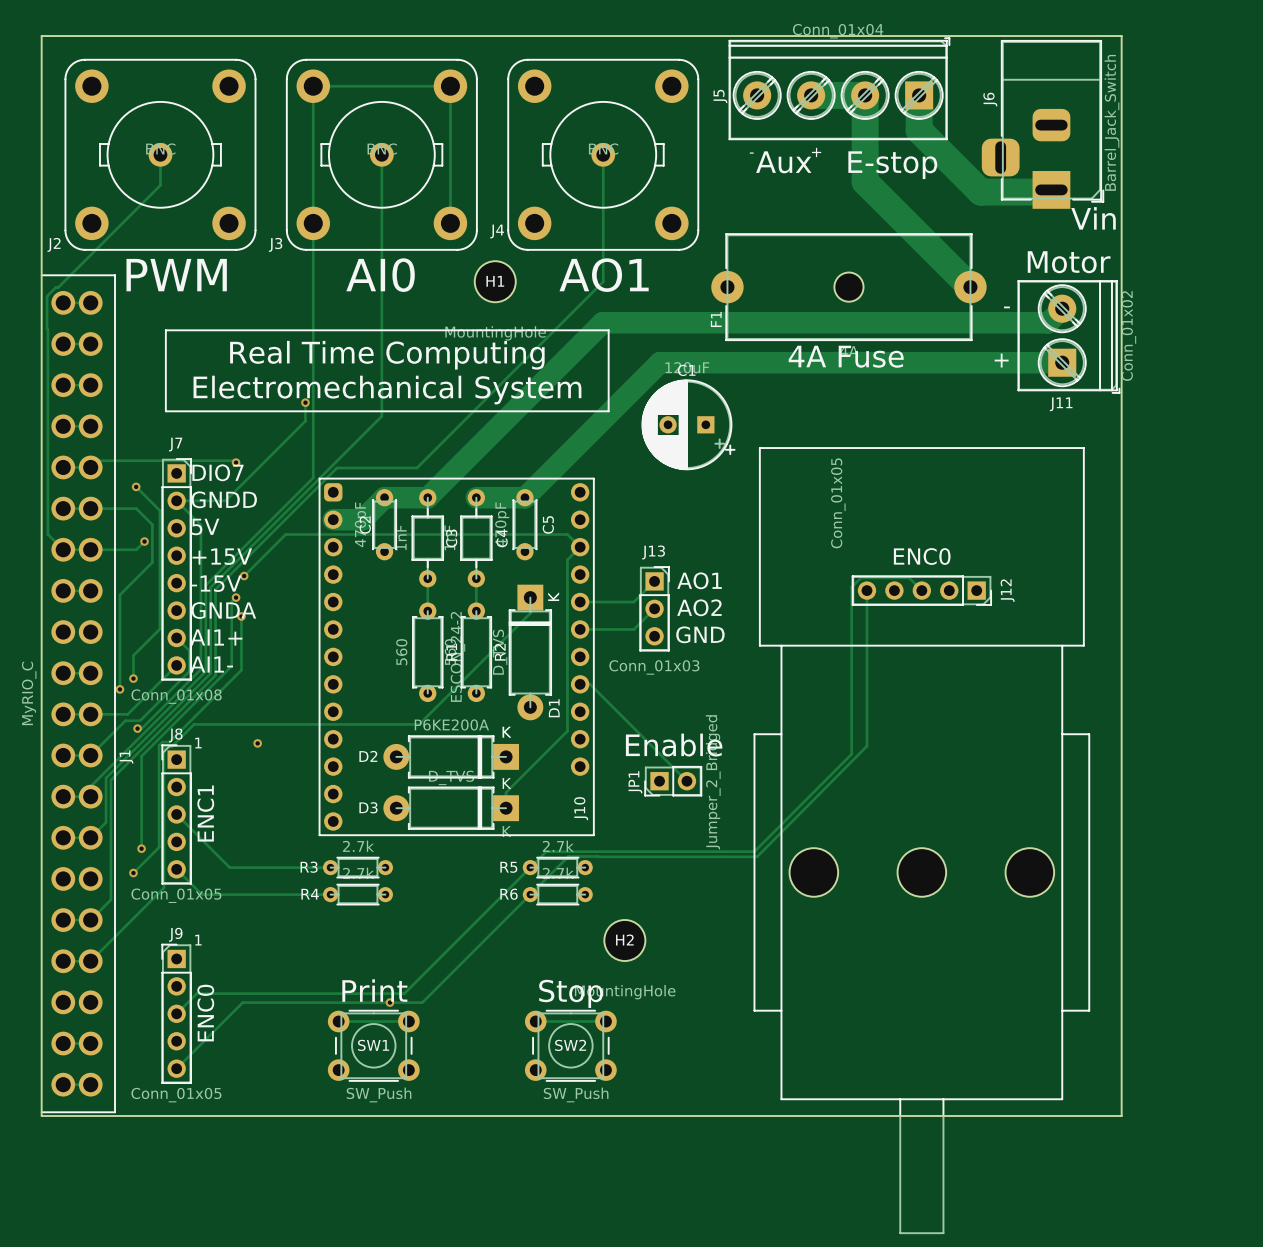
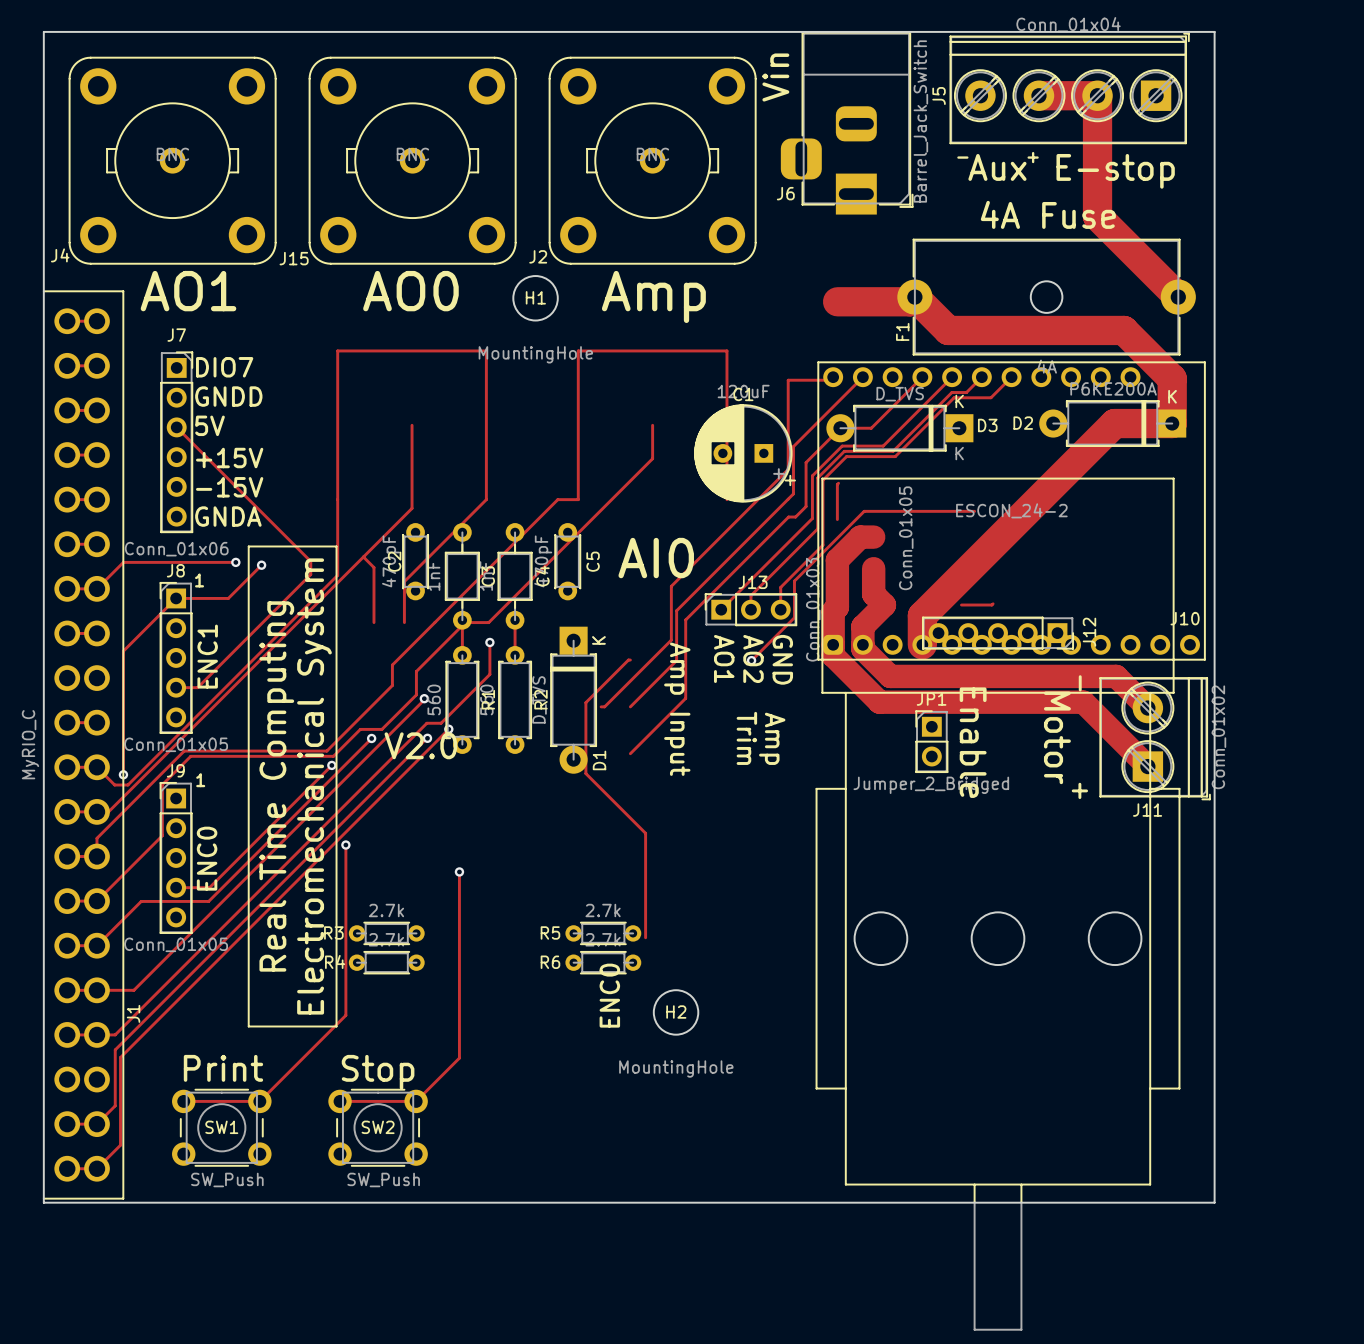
text: none -> Vin (775, 77)
J5 position: (839, 88) -> (1069, 88)
track: none -> (1038, 95) (1097, 95) (1097, 216) (1178, 297)
track: (811, 95) (865, 95) (865, 181) (970, 287) -> none
track: (919, 95) (919, 130) (980, 192) (1049, 192) (1051, 189) -> none
J6 name rotation: 0° (990, 99) -> 90° clockwise (785, 193)
J6 name position: J6 (990, 99) -> J6 (785, 193)
J6 position: (1042, 124) -> (847, 123)
text: none -> - (962, 157)
text: none -> + (1033, 157)
text: + (816, 152) -> none
text: - (751, 153) -> none
track: (160, 154) (160, 185) (58, 287) (47, 296) (47, 534) (63, 549) -> none
track: (381, 154) (381, 416) (210, 587) (210, 673) (106, 778) (106, 822) -> (652, 425) (652, 458) (488, 622) (465, 622) (416, 671) (416, 694) (381, 729) (360, 729) (333, 756) (190, 756) (162, 784) (162, 835) (113, 884)
track: (603, 154) (603, 281) (416, 468) (336, 468) (215, 589) (215, 675) (110, 780) (110, 899) (90, 920) -> (424, 698) (133, 990) (96, 990)
text position: Aux (783, 162) -> Aux (997, 167)
text position: E-stop (892, 165) -> E-stop (1115, 171)
text: Vin (1093, 218) -> none
track: (450, 223) (450, 86) (313, 86) (313, 477) (205, 585) (205, 671) (90, 786) -> (726, 499) (726, 350) (578, 350) (578, 499) (557, 499) (392, 665) (392, 685) (326, 751) (184, 751) (96, 838) (96, 845)
J4 name: J4 (497, 231) -> J2 (538, 256)
J2 name: J2 (54, 244) -> J4 (60, 255)
J3 name: J3 (275, 244) -> J15 (294, 258)
text: Motor (1069, 262) -> none
text: PWM (176, 275) -> AO1 (188, 291)
text: AI0 (380, 275) -> AO0 (410, 291)
text: AO1 (604, 275) -> Amp (653, 296)
track: none -> (837, 301) (910, 301) (914, 297) (948, 330) (1123, 330) (1172, 378) (1172, 423) (1114, 423) (922, 615) (922, 644)
F1 position: (848, 287) -> (1046, 297)
text: - (1006, 307) -> none
track: (1062, 308) (1048, 322) (602, 322) (427, 497) (384, 497) (362, 519) (333, 519) -> none
line: (165, 330) (608, 330) (608, 411) (165, 411) (165, 330) -> none
J11 position: (1068, 337) -> (1155, 738)
track: none -> (833, 377) (830, 380) (788, 380) (788, 469) (671, 586) (671, 640) (604, 706) (601, 706)
track: none -> (862, 377) (793, 446) (793, 493) (676, 610) (676, 660) (630, 706)
track: none -> (922, 377) (871, 428) (840, 428) (806, 462) (806, 506) (795, 517) (788, 517) (685, 619) (685, 698) (630, 753)
track: none -> (952, 377) (883, 446) (842, 446) (812, 475) (812, 518) (721, 609)
track: none -> (981, 377) (966, 392) (951, 392) (893, 451) (844, 451) (817, 478) (817, 528) (750, 595) (750, 609)
track: none -> (1011, 377) (990, 397) (954, 397) (895, 456) (846, 456) (822, 480) (822, 545) (780, 587) (780, 609)
text: Real Time Computing (387, 355) -> none
text position: 4A Fuse (846, 356) -> 4A Fuse (1048, 214)
text: + (1001, 360) -> none
track: (1062, 362) (659, 362) (524, 497) (476, 497) -> none
text: Electromechanical System (387, 390) -> none
track: none -> (176, 427) (310, 561) (310, 574) (197, 687) (176, 687)
track: (305, 402) (305, 421) (225, 500) (176, 500) (200, 525) (200, 669) (141, 728) (137, 728) -> none
via: (305, 402) -> none
J7 name position: J7 (175, 444) -> J7 (176, 335)
track: none -> (838, 483) (837, 519)
J7 footprint: [161, 458, 192, 681] -> [160, 351, 193, 533]
track: (236, 462) (234, 460) (97, 460) (90, 467) -> none
via: (236, 462) -> none
text position: DIO7 (217, 472) -> DIO7 (224, 367)
track: none -> (974, 511) (864, 511) (794, 581) (794, 617) (751, 660)
track: (136, 486) (159, 510) (159, 629) (133, 655) (133, 678) -> none
via: (136, 486) -> none
text position: GNDD (224, 499) -> GNDD (228, 396)
track: none -> (873, 537) (860, 537) (837, 560) (837, 607) (833, 611) (833, 655) (879, 702) (1083, 702) (1147, 766)
track: (90, 508) (136, 508) (152, 524) (152, 562) (119, 594) (119, 689) -> none
line: none -> (248, 546) (248, 1026) (336, 1026) (336, 546) (248, 546)
track: none -> (363, 557) (373, 567) (373, 622)
text: none -> AI0 (656, 558)
via: none -> (235, 562)
text position: 5V (205, 526) -> 5V (210, 425)
track: none -> (261, 565) (228, 598) (176, 598) (123, 651) (123, 774)
via: none -> (261, 565)
track: none -> (873, 568) (873, 594) (884, 605) (862, 626) (862, 649) (890, 676) (1116, 676) (1147, 708)
track: (144, 541) (136, 549) (90, 549) -> (235, 562) (123, 562) (96, 588)
via: (144, 541) -> none
text: none -> 1 (199, 580)
J13 name position: J13 (653, 552) -> J13 (753, 582)
text position: +15V (222, 556) -> +15V (229, 458)
text: ENC0 (922, 556) -> none
track: none -> (993, 603) (961, 605)
track: (244, 576) (285, 534) (567, 534) (580, 547) (567, 559) (567, 731) (506, 792) (506, 808) -> none
via: (244, 576) -> none
text rotation: 0° (699, 580) -> 90° clockwise (724, 658)
track: (654, 581) (633, 602) (580, 602) -> none
text position: -15V (216, 583) -> -15V (229, 487)
track: (866, 590) (866, 746) (757, 856) (568, 856) (422, 1002) (242, 1002) (176, 1068) -> none
track: (921, 590) (909, 577) (860, 577) (851, 587) (851, 754) (754, 851) (546, 851) (404, 993) (196, 993) (176, 1013) -> none
track: (236, 597) (231, 601) (231, 666) (141, 756) (141, 848) -> none
via: (236, 597) -> none
track: (530, 597) (530, 613) (419, 724) (194, 724) (171, 746) (164, 746) (163, 887) (90, 961) -> (489, 642) (489, 674) (441, 723) (426, 723) (115, 1034) (96, 1034)
via: none -> (489, 642)
text rotation: 0° (699, 607) -> 90° clockwise (753, 658)
track: (654, 608) (633, 629) (580, 629) -> none
J13 rotation: 0° (654, 608) -> 90° counterclockwise (750, 609)
J13 position: (654, 608) -> (750, 609)
text position: GNDA (223, 610) -> GNDA (228, 516)
track: none -> (630, 660) (585, 702) (585, 773) (645, 833) (645, 937)
via: none -> (751, 660)
track: (241, 616) (241, 670) (169, 742) (162, 742) (159, 745) (159, 847) (133, 873) -> none
via: (241, 616) -> none
text: none -> - (1080, 683)
text rotation: 0° (700, 634) -> 90° clockwise (782, 659)
text: AI1+ (216, 637) -> none
track: (176, 638) (189, 650) (189, 671) (140, 720) (125, 720) (90, 755) -> (412, 425) (412, 508) (108, 811) (96, 811)
via: none -> (424, 698)
J10 rotation: 0° (456, 656) -> 90° counterclockwise (1011, 511)
J10 position: (456, 656) -> (1011, 511)
text: none -> Amp Input (677, 709)
text: AI1- (211, 664) -> none
track: (176, 665) (127, 714) (90, 714) -> (404, 622) (404, 581) (486, 499) (486, 350) (337, 350) (337, 575) (127, 785) (114, 785) (96, 767)
via: (133, 678) -> none
track: none -> (448, 729) (120, 1057) (120, 1145) (96, 1168)
via: none -> (448, 729)
track: (580, 684) (590, 684) (686, 781) -> none
track: none -> (371, 738) (208, 901) (141, 901) (96, 945) (67, 945)
via: none -> (371, 738)
track: none -> (427, 738) (115, 1049) (115, 1105) (96, 1124)
via: none -> (427, 738)
text: none -> Trim (746, 738)
text: none -> Motor (1057, 737)
text: none -> Amp (772, 738)
via: (119, 689) -> none
text: none -> V2.0 (420, 745)
J7 value: Conn_01x08 (176, 696) -> Conn_01x06 (176, 549)
track: none -> (331, 765) (209, 887) (176, 887)
via: none -> (331, 765)
via: none -> (123, 774)
via: (137, 728) -> none
text: none -> Real Time Computing (276, 786)
text: none -> Electromechanical System (314, 786)
text: none -> + (1079, 790)
text position: 1 (198, 743) -> 1 (200, 780)
via: (257, 743) -> none
text rotation: 0° (674, 745) -> 90° clockwise (973, 742)
text position: Enable (674, 745) -> Enable (973, 742)
J1 name position: J1 (126, 756) -> J1 (133, 1013)
D2 position: (451, 756) -> (1112, 423)
JP1 rotation: 0° (673, 781) -> 90° clockwise (931, 741)
JP1 position: (673, 781) -> (931, 741)
track: none -> (345, 845) (345, 1015) (259, 1101) (183, 1101)
via: none -> (345, 845)
text: none -> ENC0 (207, 858)
D3 name position: D3 (368, 807) -> D3 (987, 425)
D3 position: (451, 808) -> (899, 428)
J10 name position: J10 (581, 808) -> J10 (1185, 618)
track: none -> (459, 871) (459, 1058) (416, 1101) (340, 1101)
via: none -> (459, 871)
text position: ENC1 (205, 813) -> ENC1 (207, 656)
track: (176, 814) (229, 867) (330, 867) -> none
J8 position: (176, 814) -> (176, 657)
via: (141, 848) -> none
track: (176, 869) (201, 894) (330, 894) -> none
via: (133, 873) -> none
text: none -> ENC0 (609, 995)
text: 1 (198, 940) -> none
text position: Print (374, 990) -> Print (223, 1068)
text position: Stop (571, 993) -> Stop (378, 1072)
via: (389, 1002) -> none
J9 position: (176, 1013) -> (176, 857)
text: ENC0 (205, 1013) -> none
track: (338, 1021) (408, 1021) -> none
track: (535, 1021) (605, 1021) -> none
SW1 position: (373, 1045) -> (221, 1127)
SW2 position: (570, 1045) -> (378, 1127)

